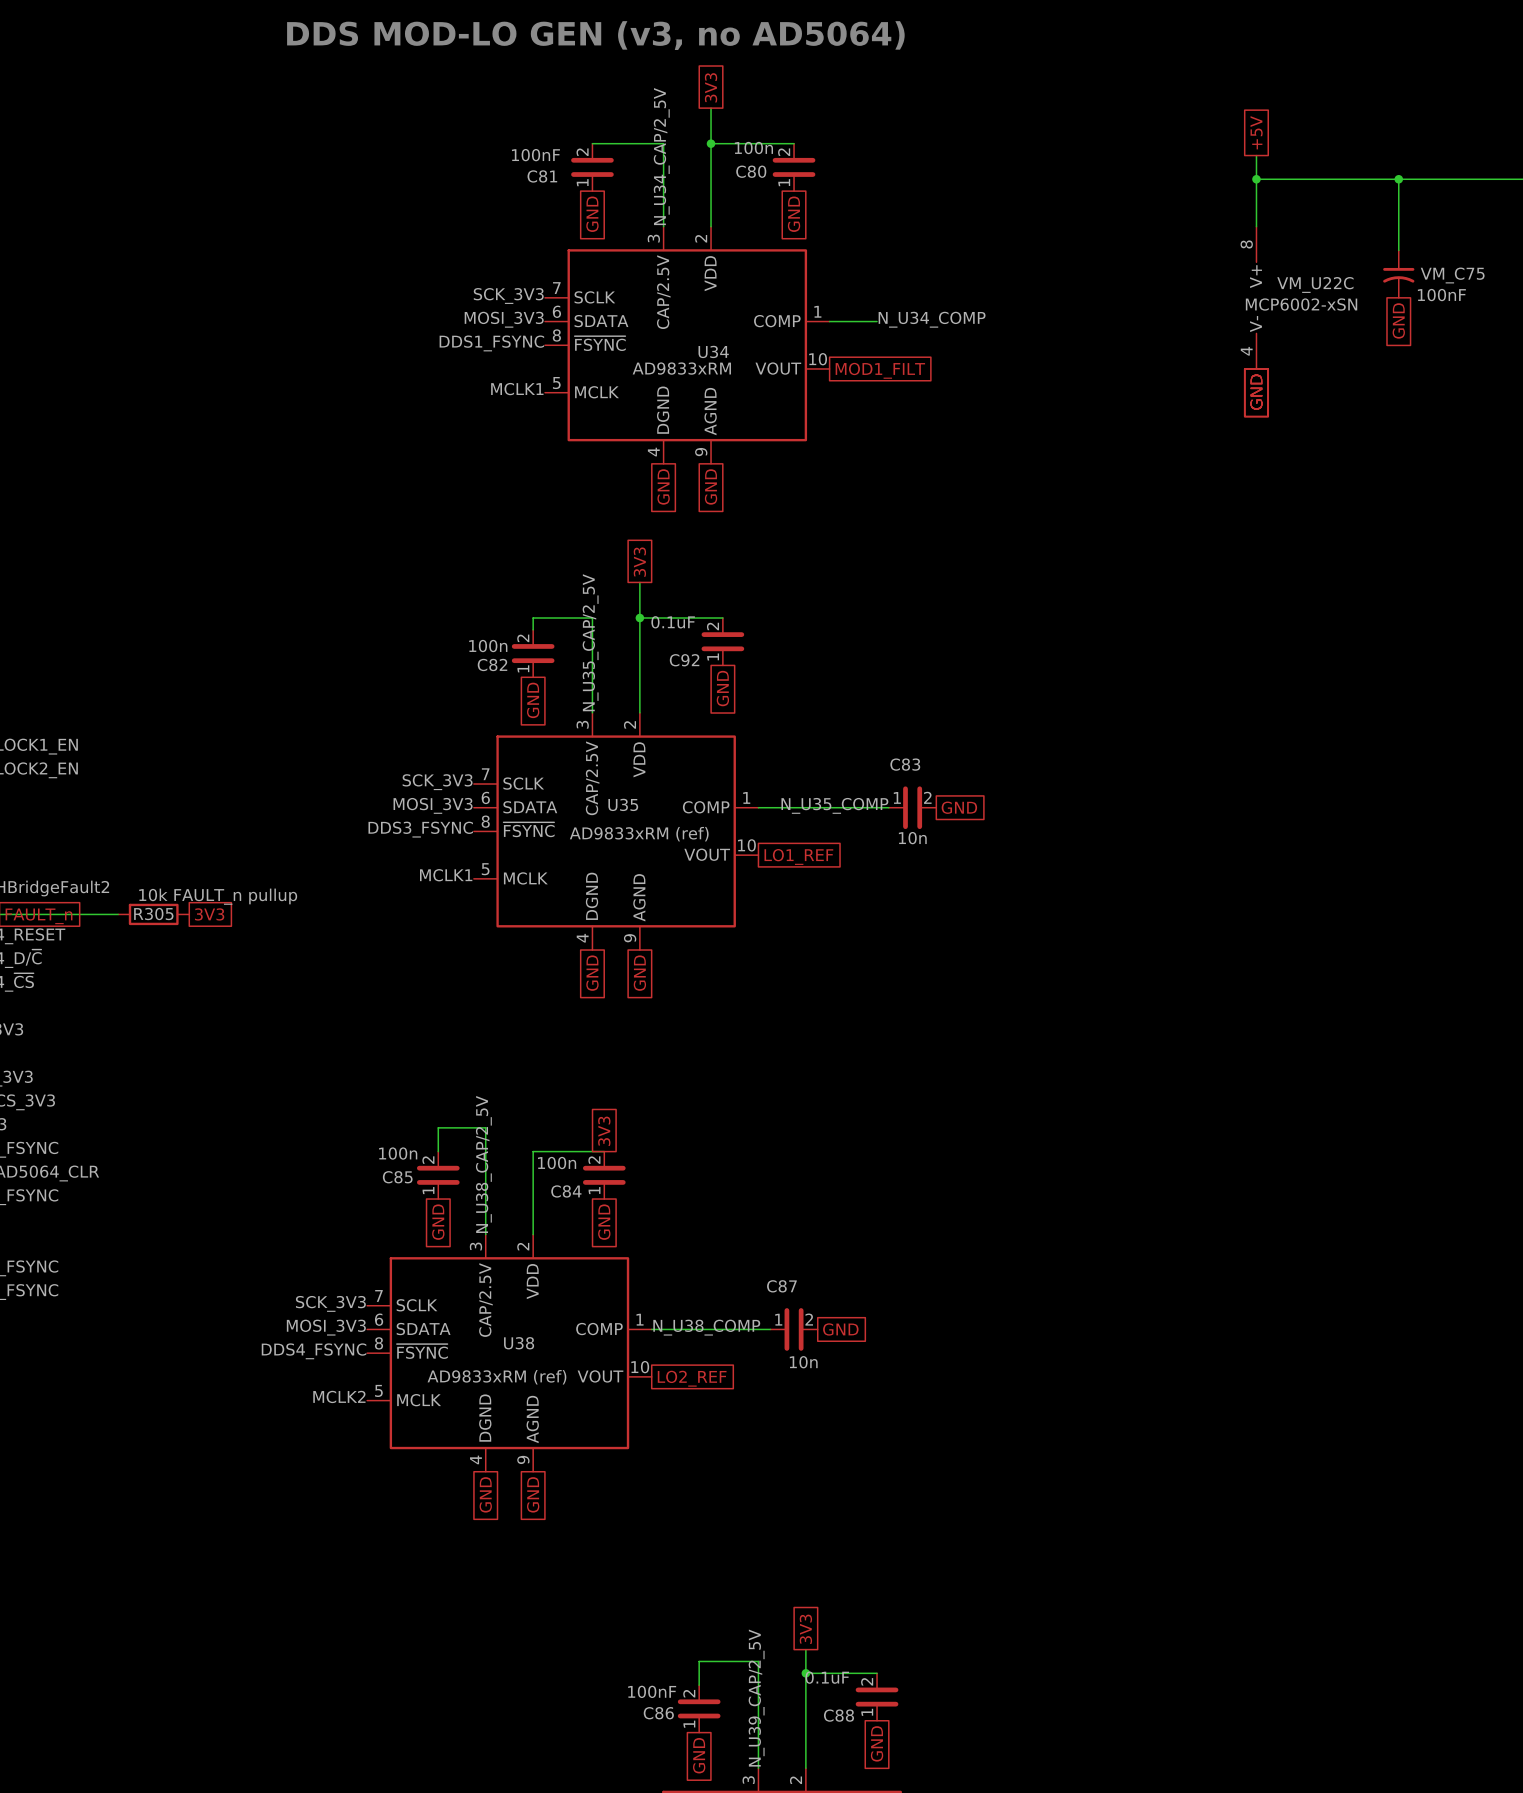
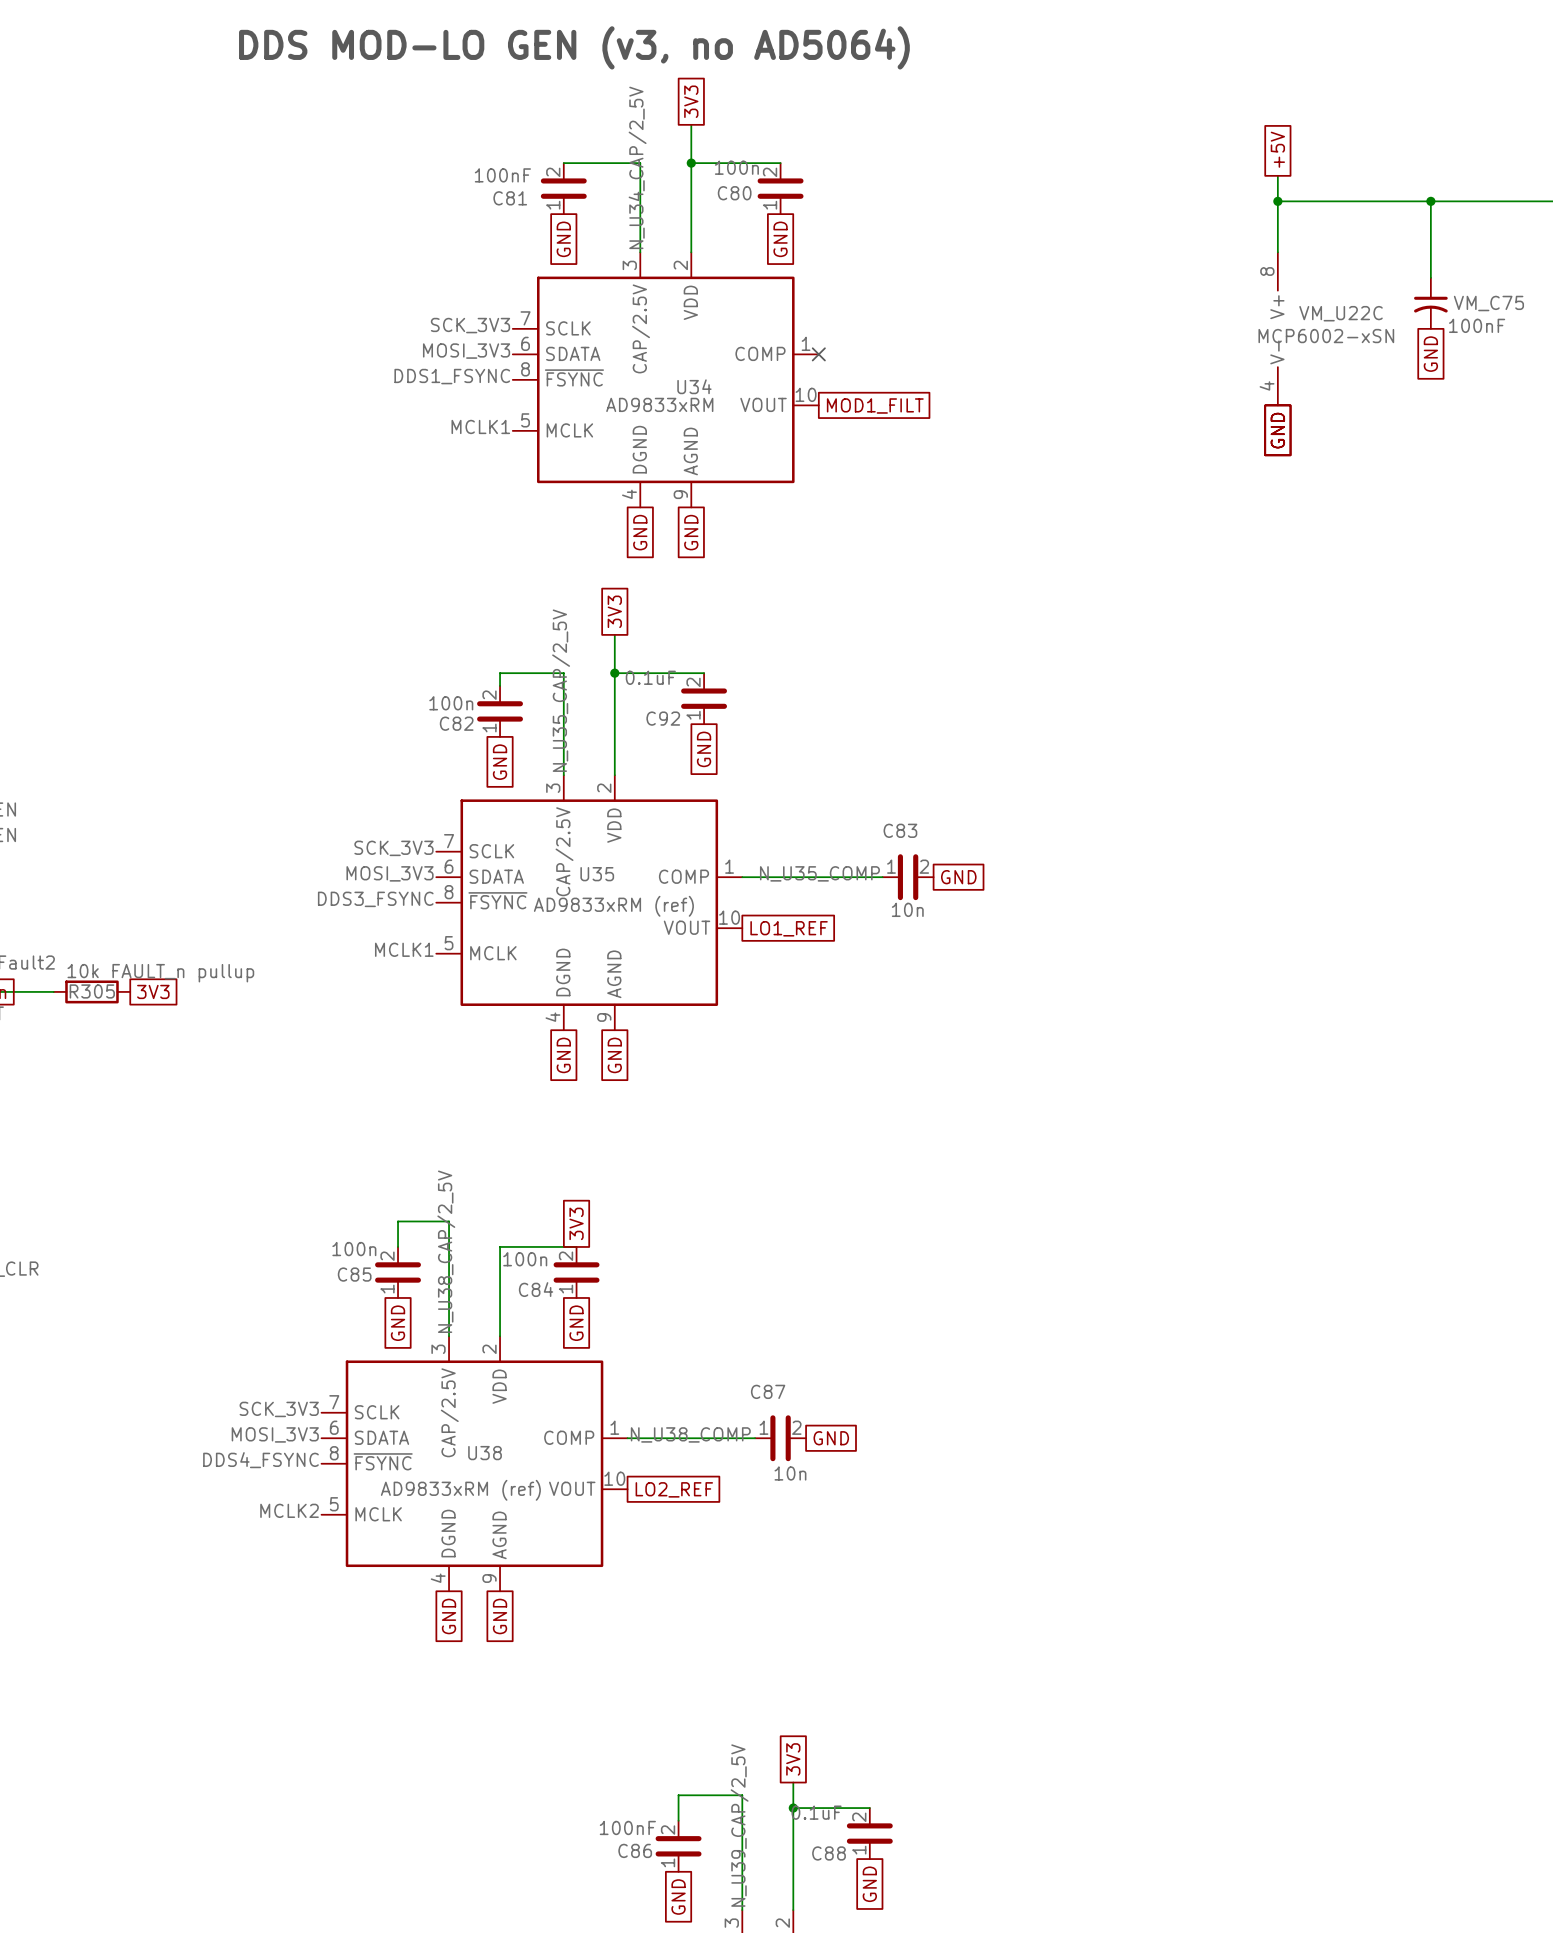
label: N_U34_COMP (932, 319) -> none
wire: (829, 321) (877, 321) -> none
no-connect mark: none -> (818, 354)

